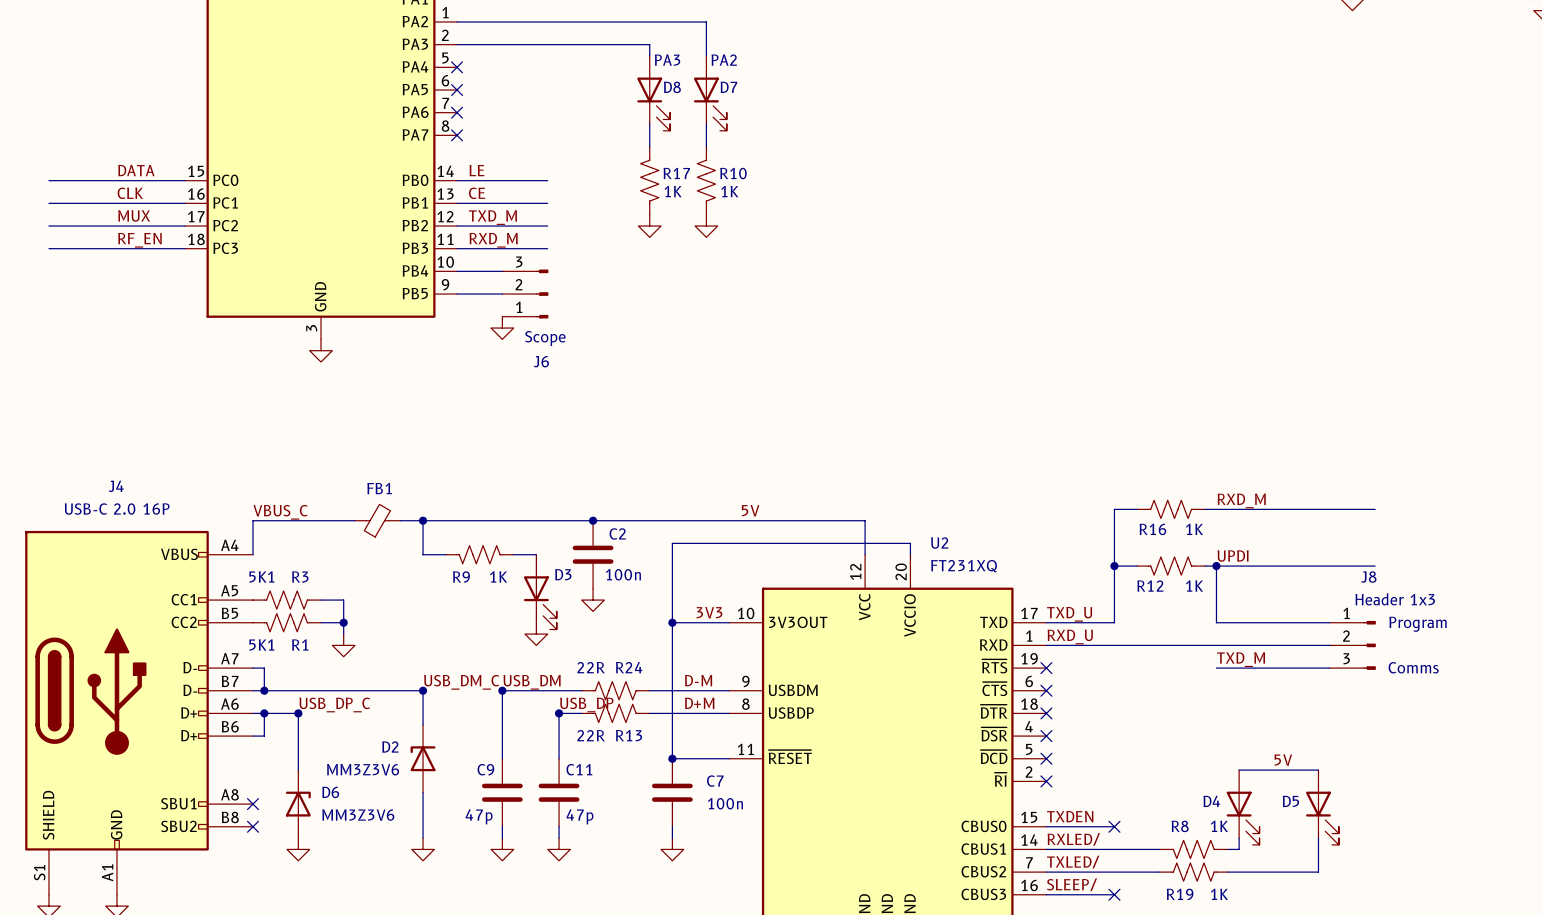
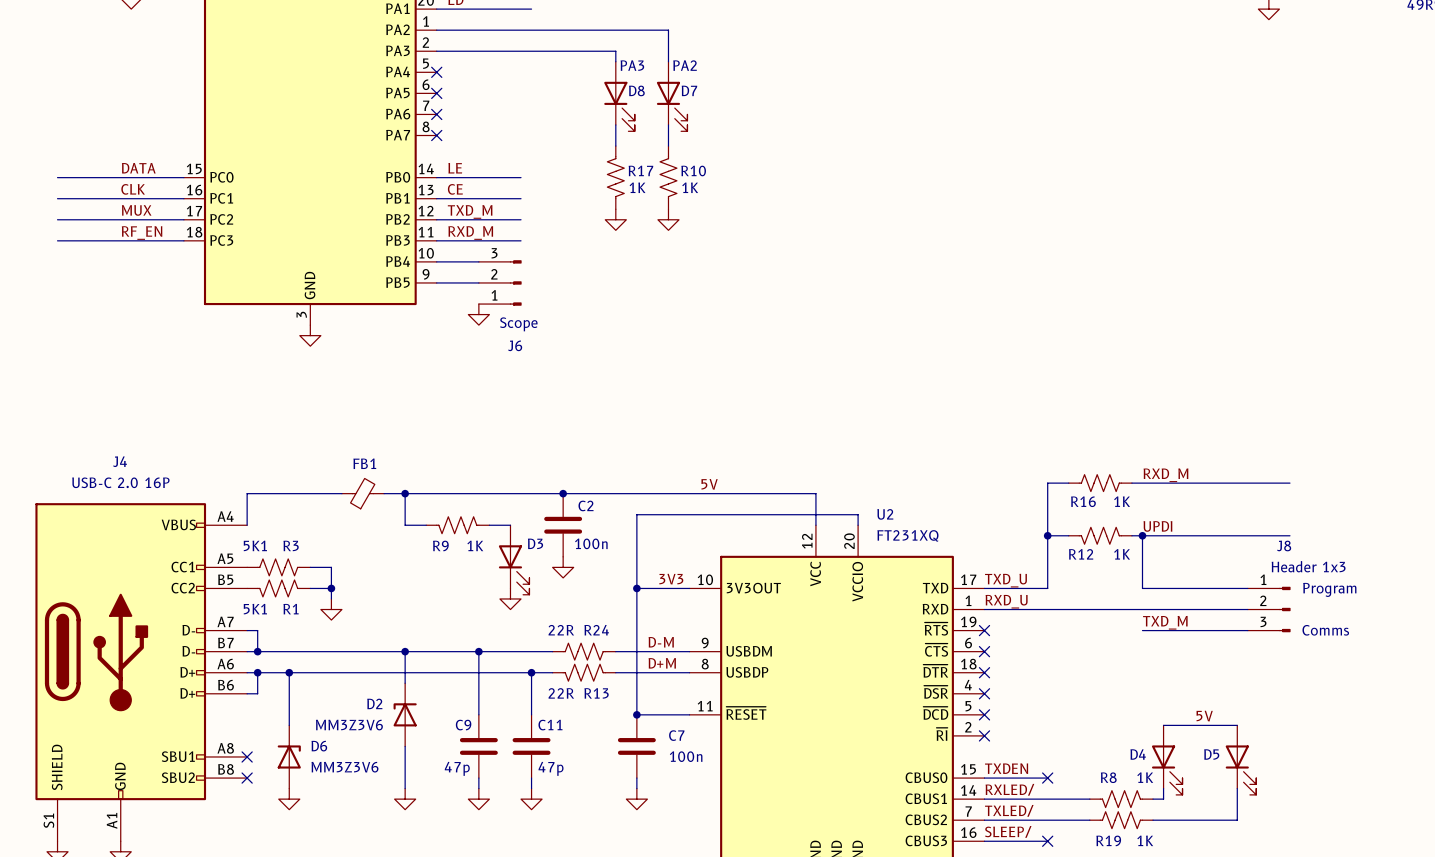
label: VBUS_C (280, 512) -> none
label: USB_DM_C (461, 682) -> none
label: USB_DM (532, 682) -> none
wire: none -> (405, 651) (478, 651)
label: USB_DP_C (334, 704) -> none
label: USB_DP (586, 704) -> none
wire: none -> (289, 672) (531, 672)

